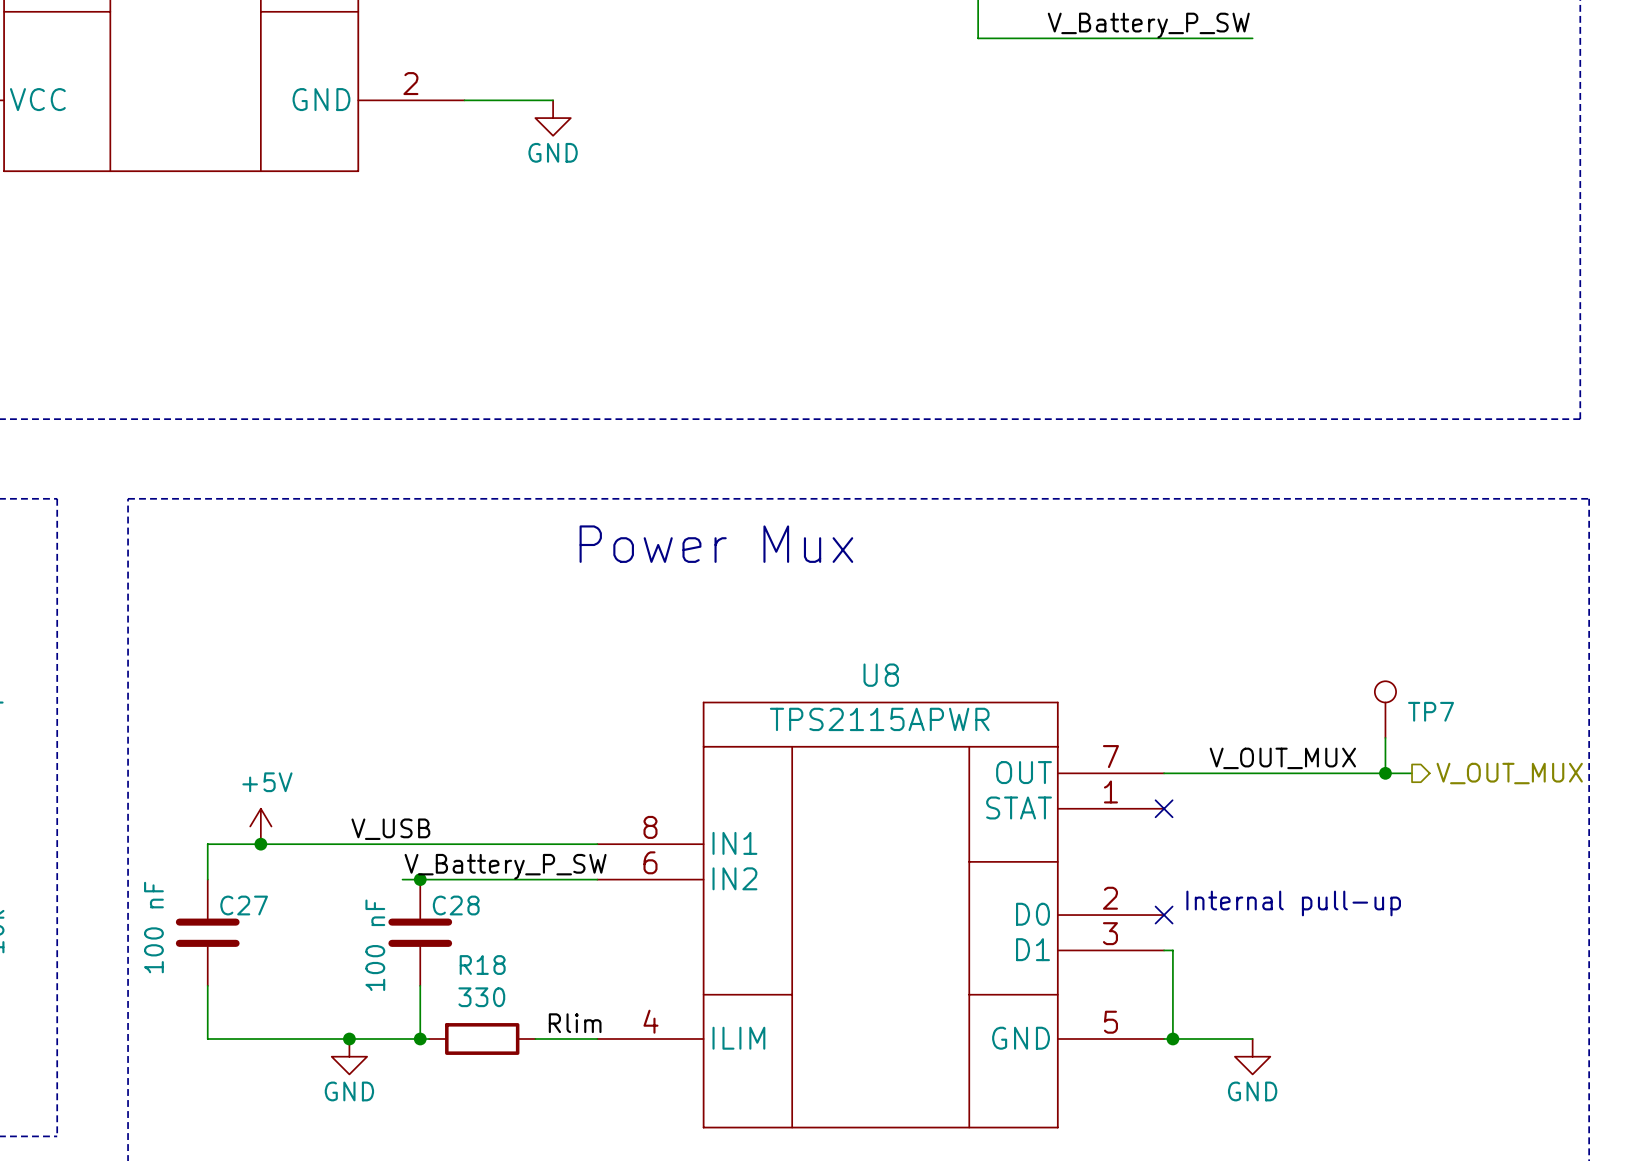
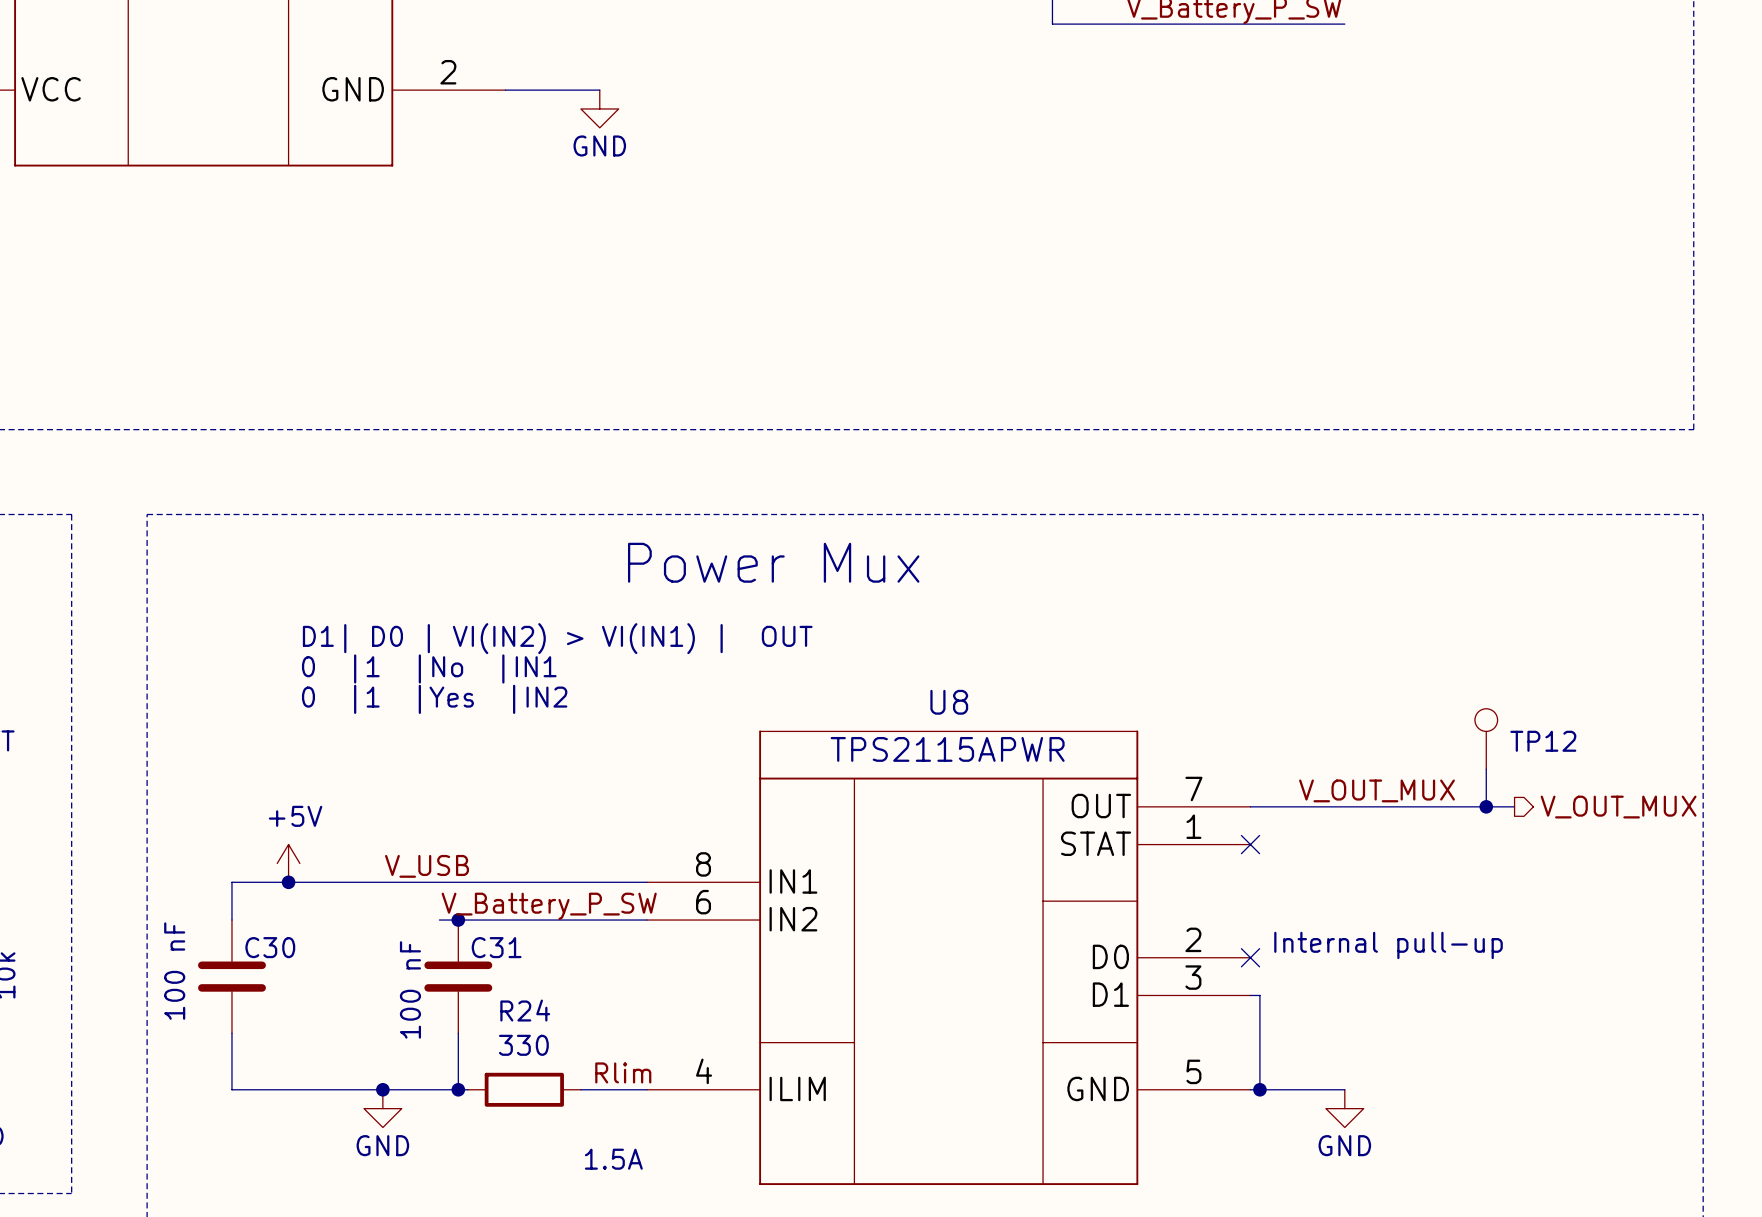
text: none -> D1| D0 | VI(IN2) > VI(IN1) | OUT (557, 638)
text: none -> 0 |1 |No |IN1 (429, 668)
text: none -> 0 |1 |Yes |IN2 (434, 699)
TP7 name: TP7 (1431, 711) -> TP12 (1543, 741)
C27 name: C27 (244, 905) -> C30 (270, 947)
C28 name: C28 (456, 905) -> C31 (496, 947)
R18 name: R18 (482, 965) -> R24 (525, 1010)
text: none -> 1.5A (613, 1159)

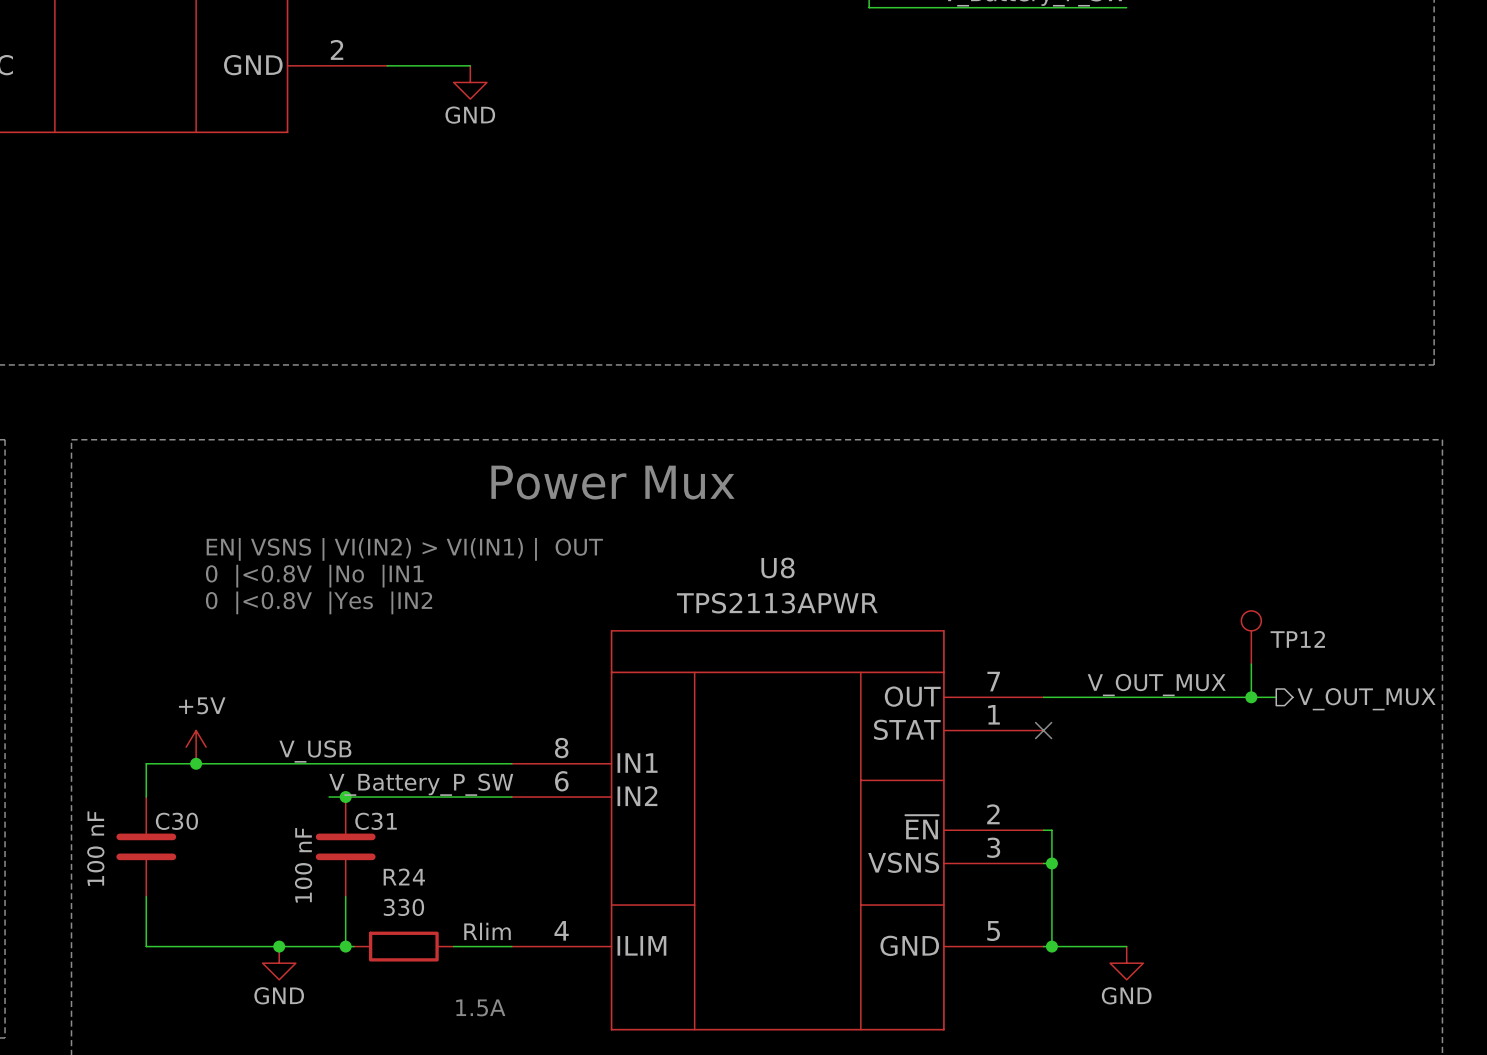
text: D1| D0 | VI(IN2) > VI(IN1) | OUT (557, 638) -> EN| VSNS | VI(IN2) > VI(IN1) | OUT (404, 549)
text: 0 |1 |No |IN1 (429, 668) -> 0 |<0.8V |No |IN1 (314, 576)
text: 0 |1 |Yes |IN2 (434, 699) -> 0 |<0.8V |Yes |IN2 (319, 602)
U8 name position: U8 (949, 702) -> U8 (777, 567)
U8 value: TPS2115APWR (947, 749) -> TPS2113APWR (777, 603)
text: Internal pull-up (1388, 945) -> none
U8 pin name: D0 (1110, 956) -> ~{EN} (922, 827)
wire: none -> (1043, 830) (1051, 830) (1051, 863)
no-connect mark: (1250, 957) -> none
U8 pin name: D1 (1110, 994) -> VSNS (903, 862)
junction: none -> (1051, 863)

